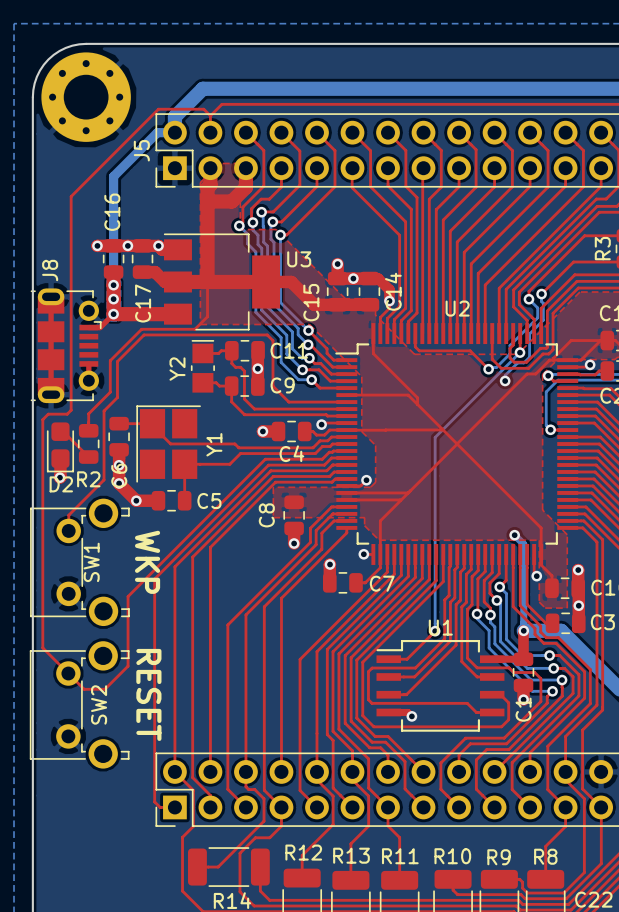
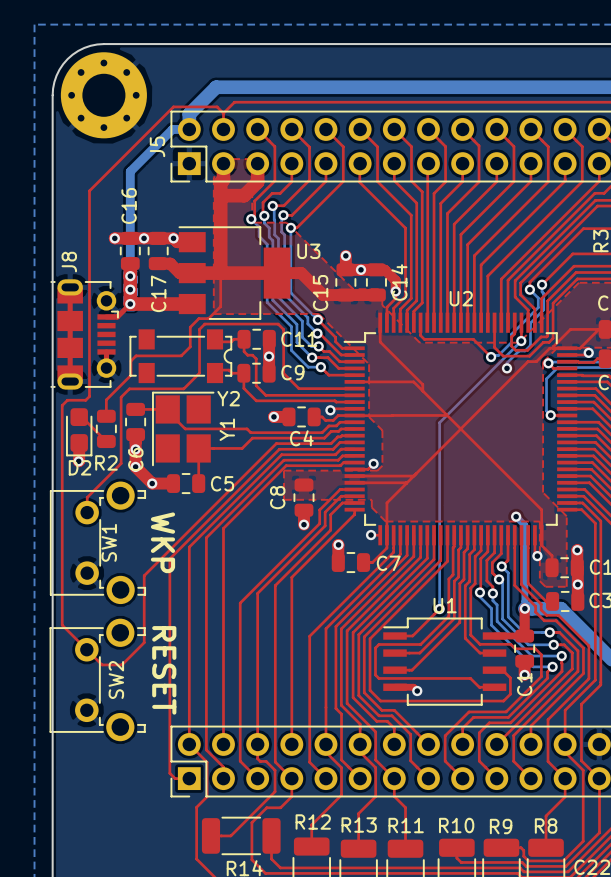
top track: (184, 329) (141, 329) (110, 360) (110, 392) -> (198, 318) (190, 327) (190, 346) (181, 355) (136, 355) (130, 360) (130, 375) (127, 379)
top track: (191, 334) (144, 334) (117, 361) (117, 397) (112, 402) -> (204, 324) (199, 329) (199, 373) (183, 388) (129, 388)
Y2 footprint: [190, 340, 215, 393] -> [129, 329, 233, 384]
Y2 name position: Y2 (177, 369) -> Y2 (228, 398)

